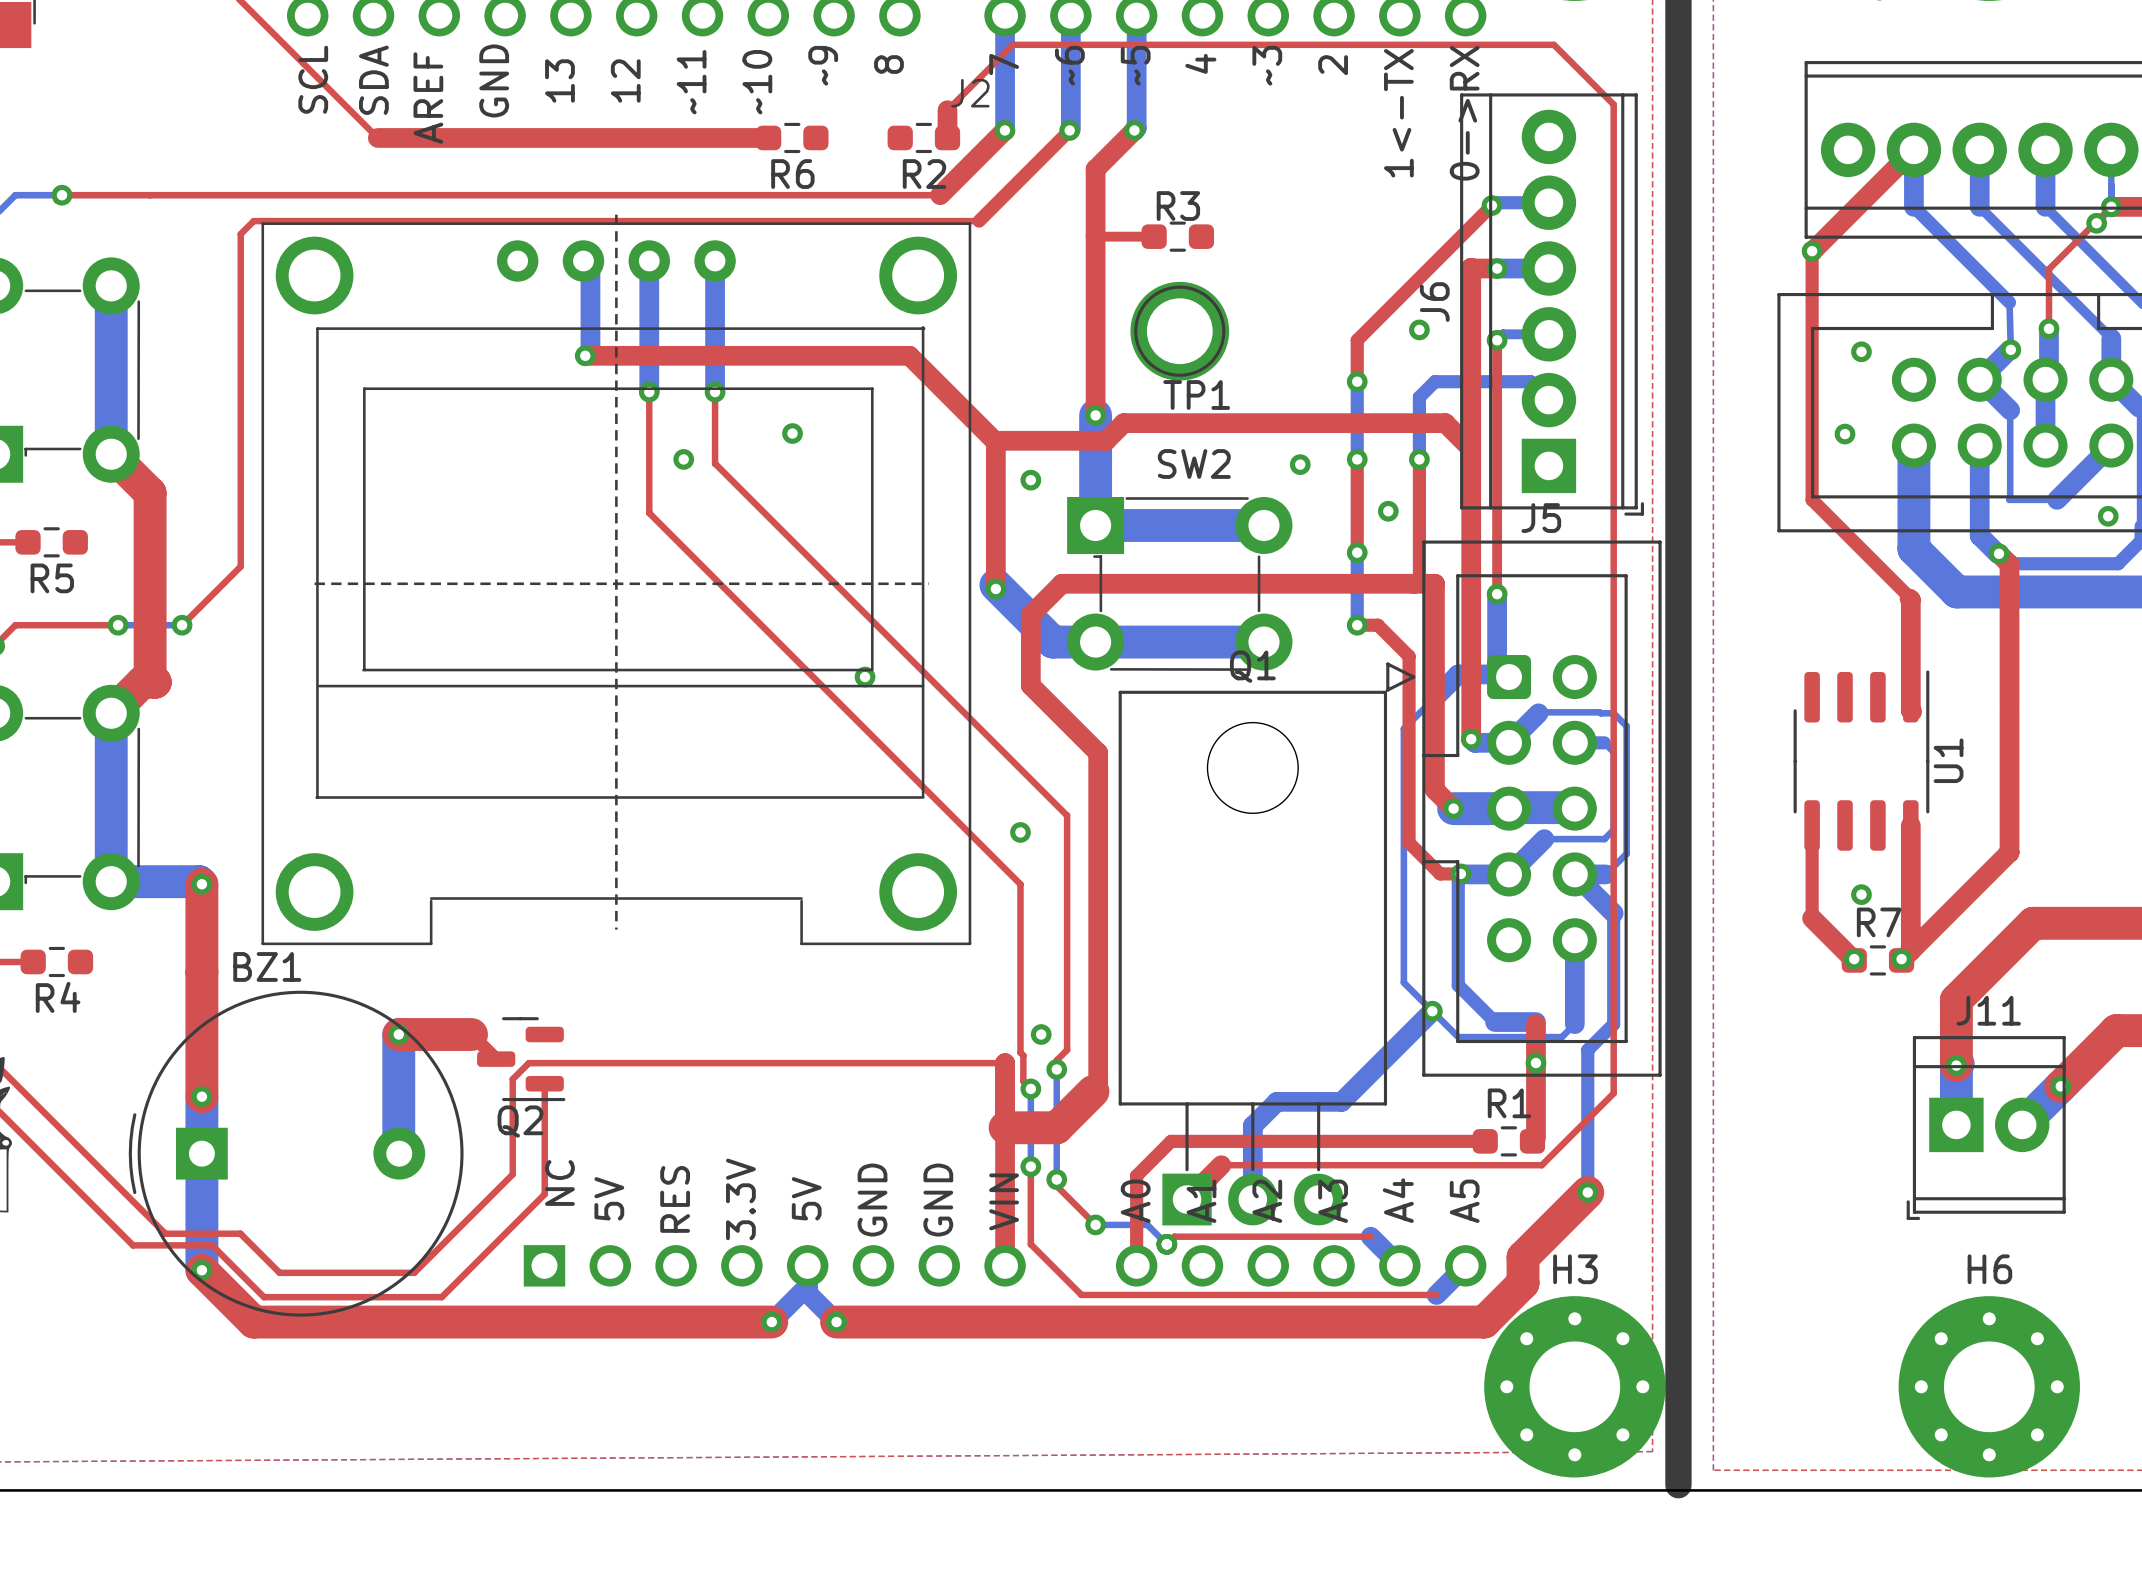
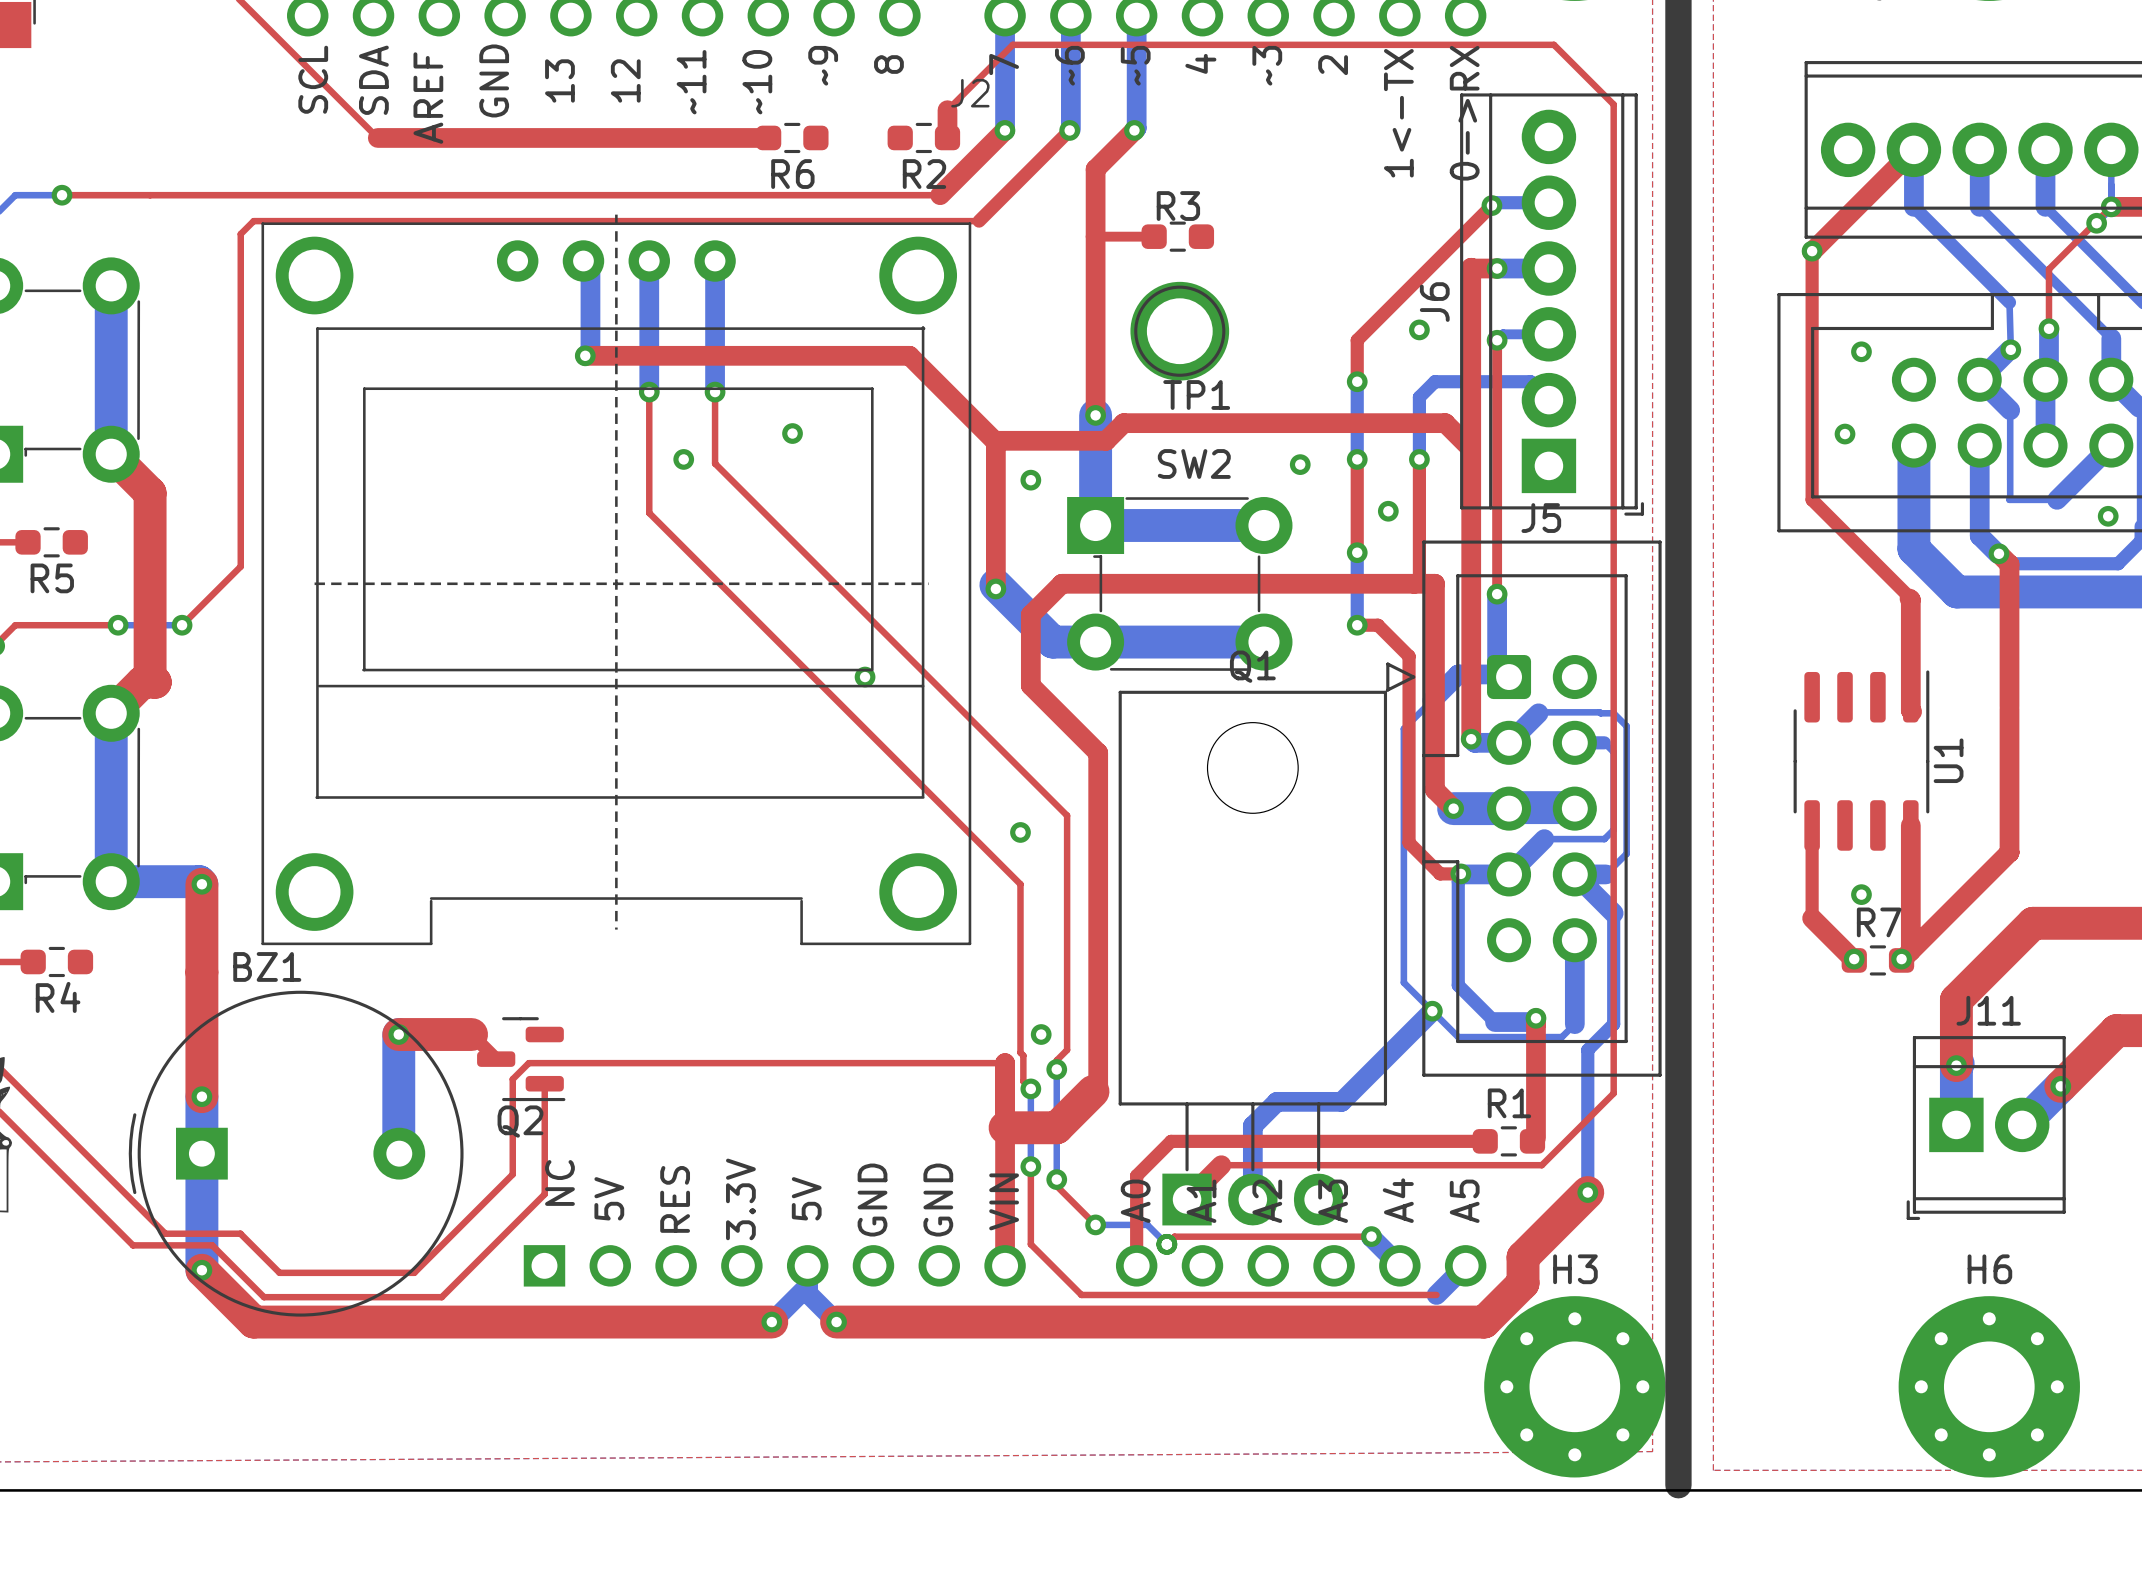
via position: (1535, 1063) -> (1535, 1018)
via: none -> (1371, 1236)

